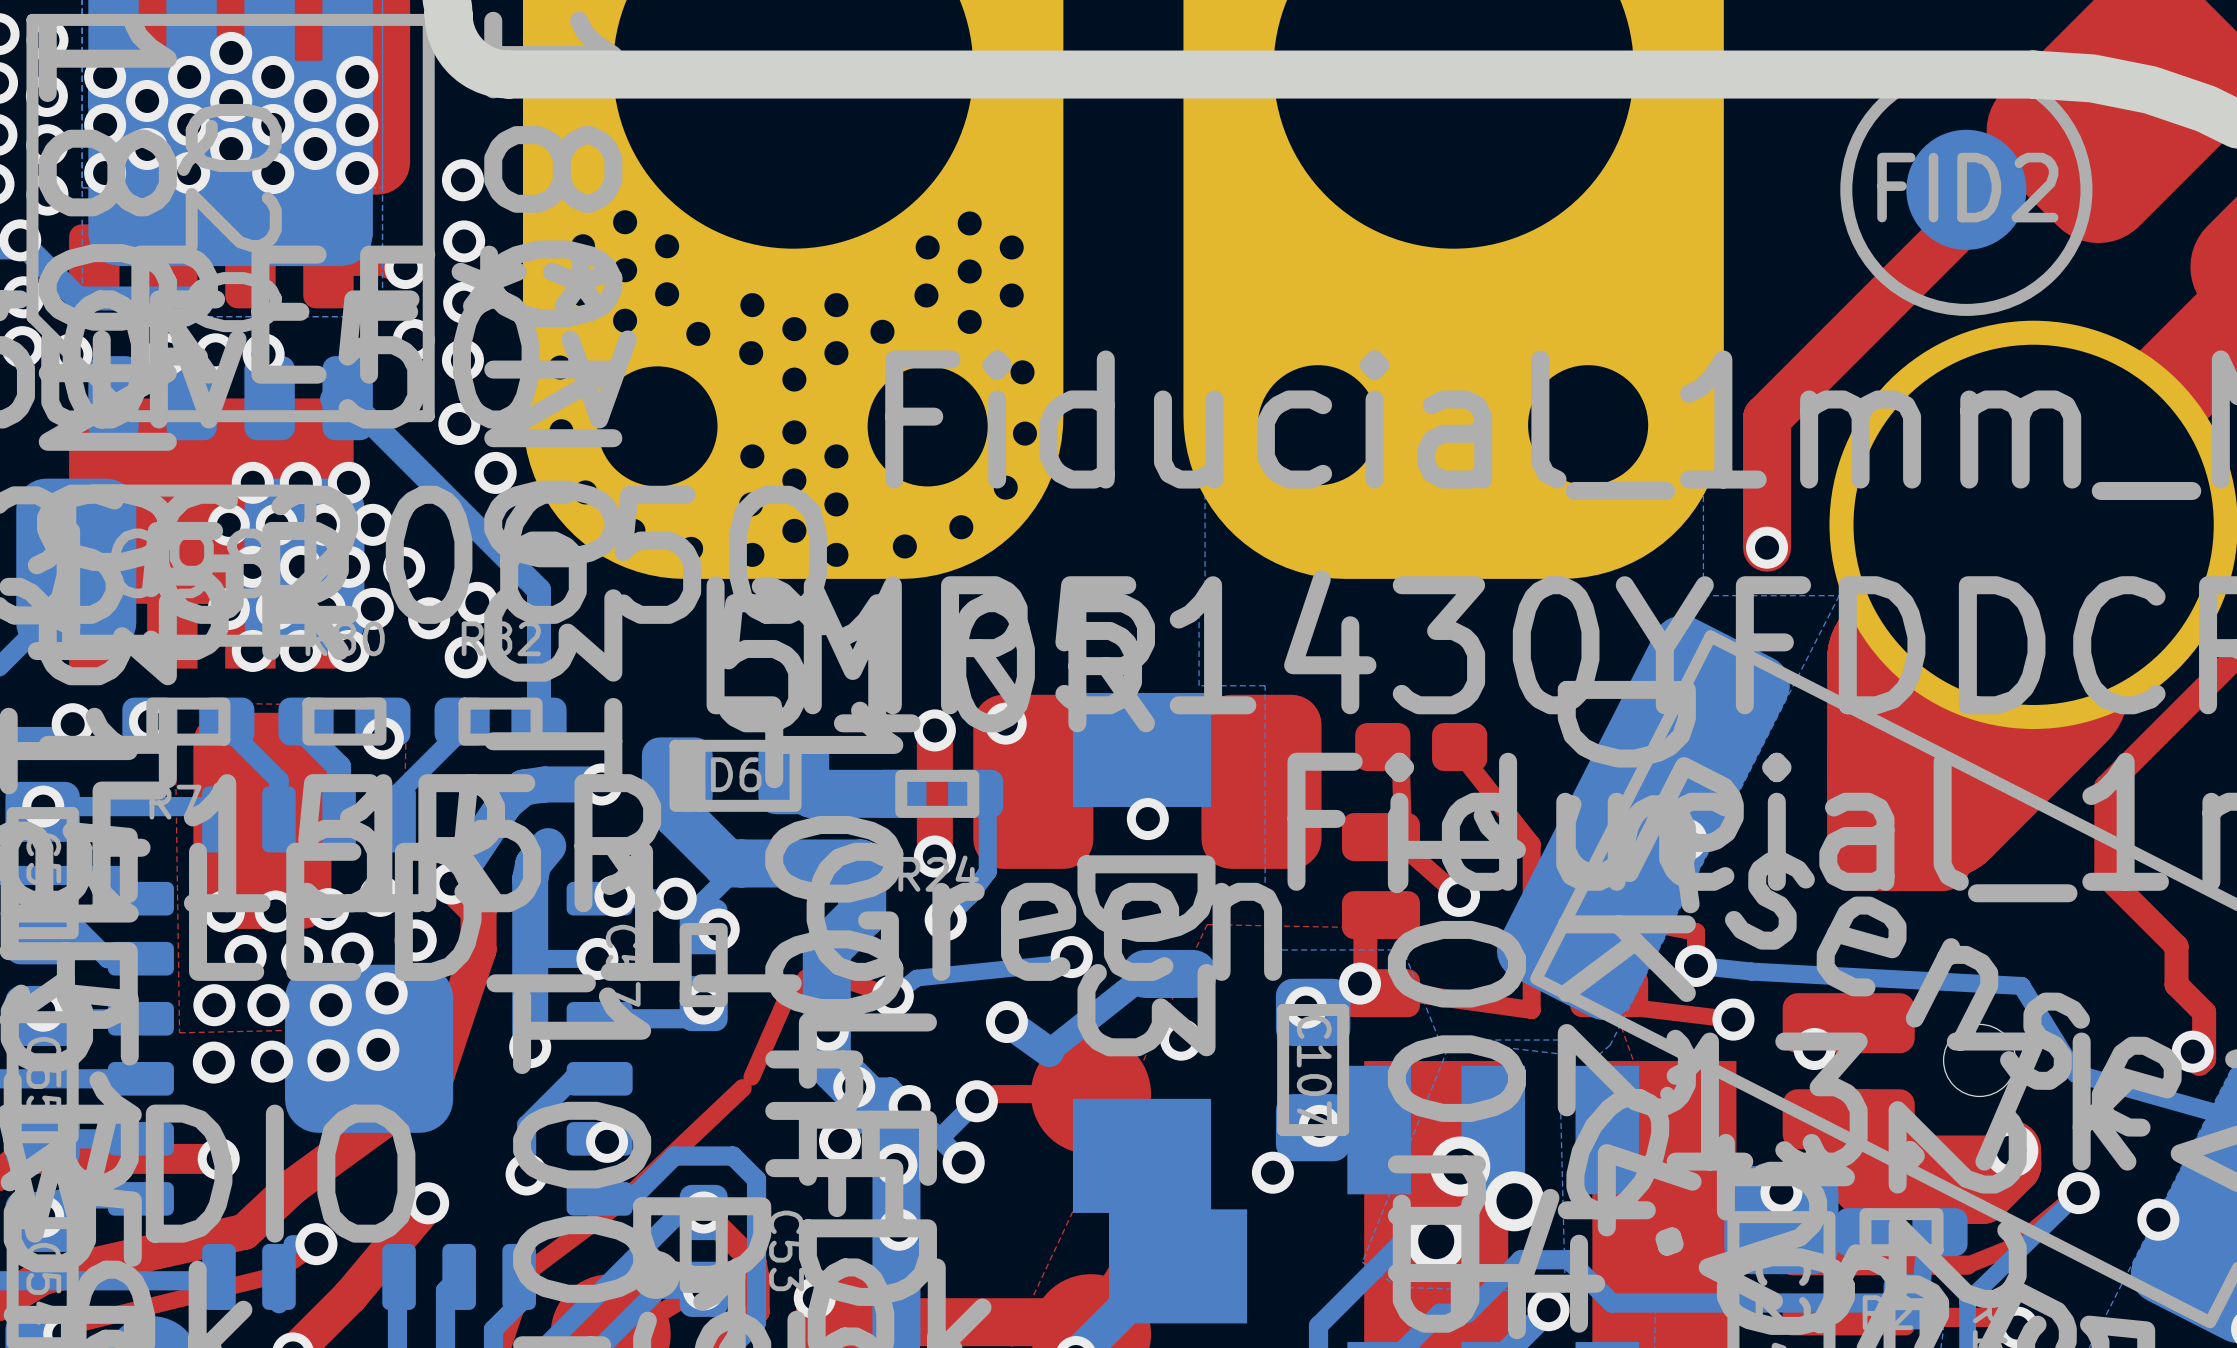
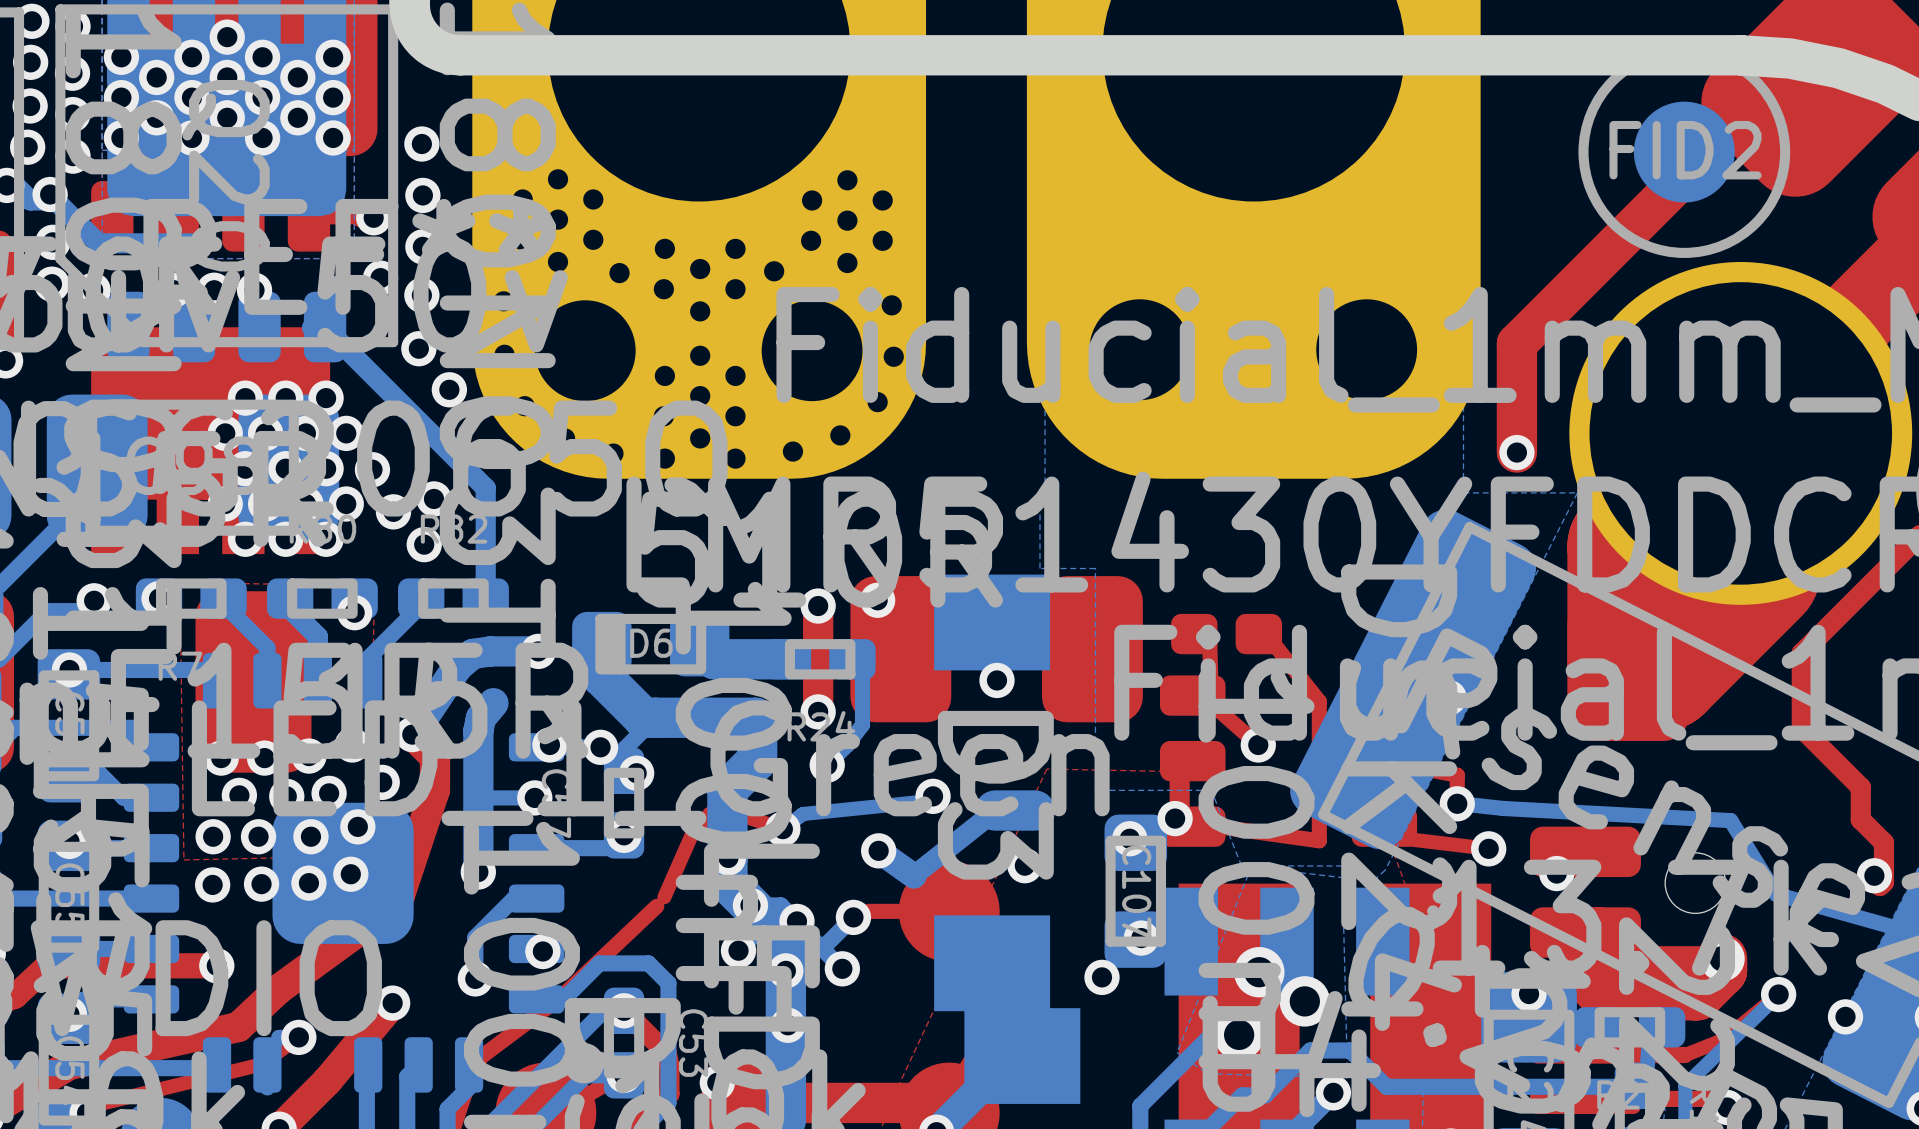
part position: (1421, 747) -> (1226, 634)

